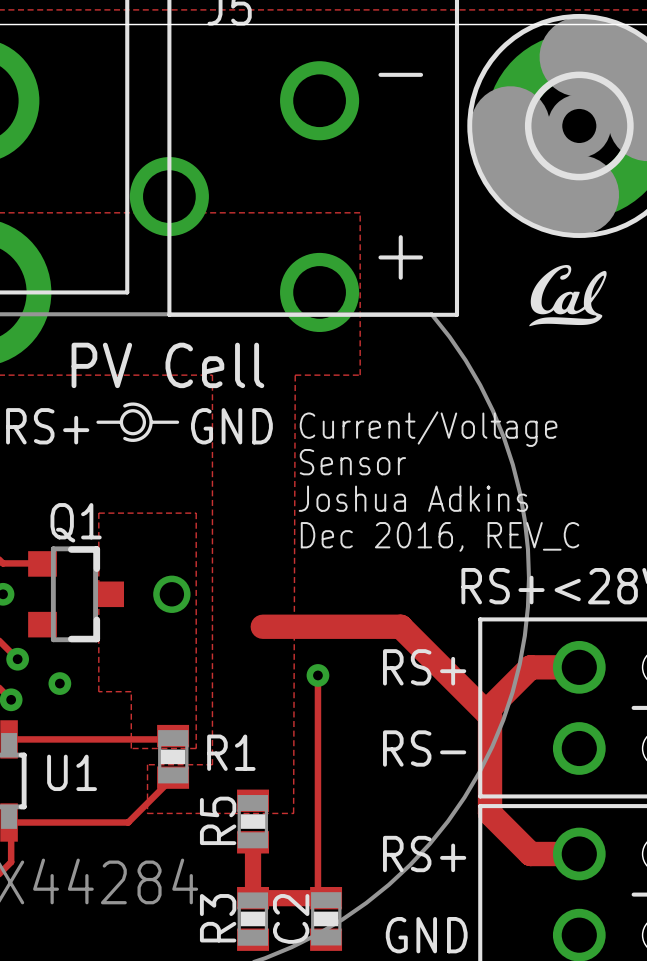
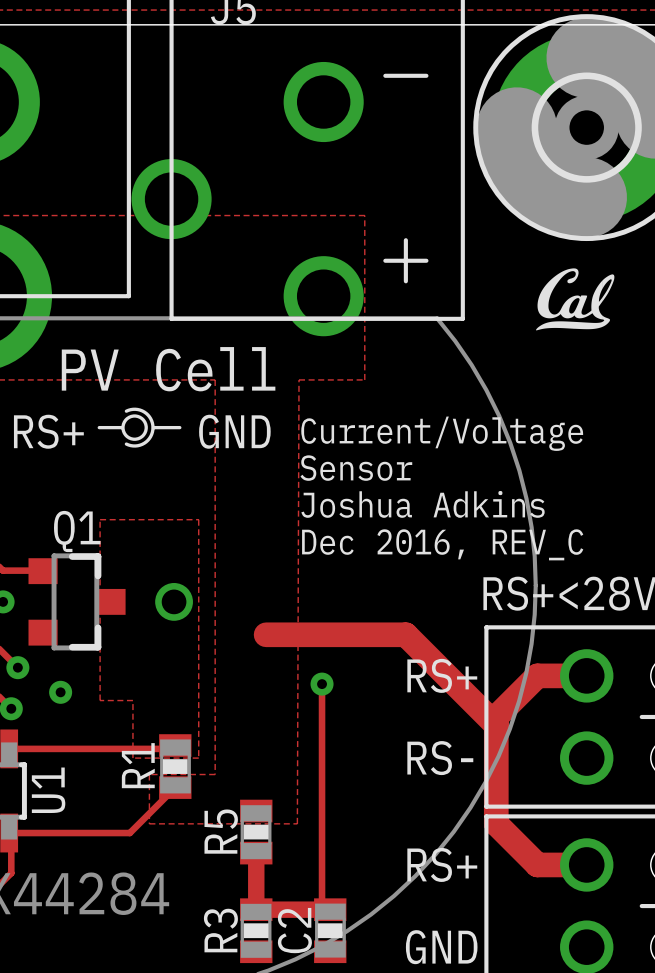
R1 name rotation: 0° (231, 752) -> 90° counterclockwise (138, 765)
R1 name position: R1 (231, 752) -> R1 (138, 765)
U1 name rotation: 0° (72, 772) -> 90° counterclockwise (48, 790)

